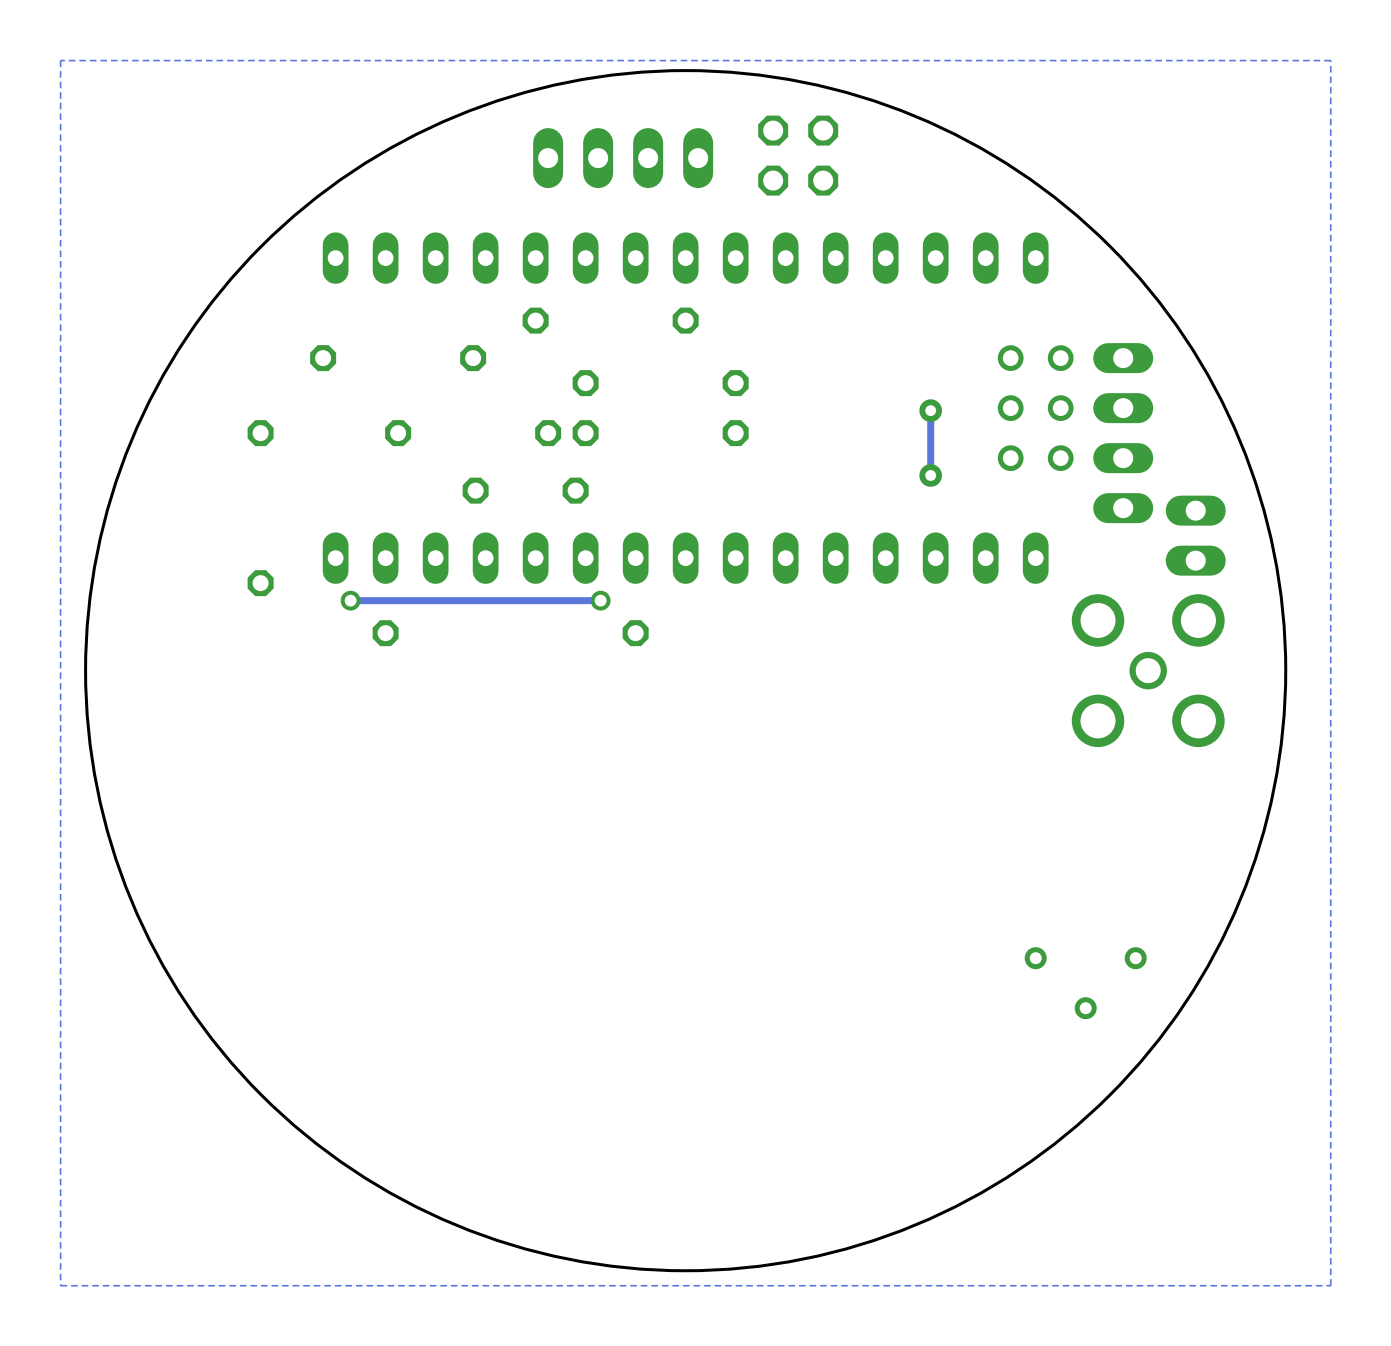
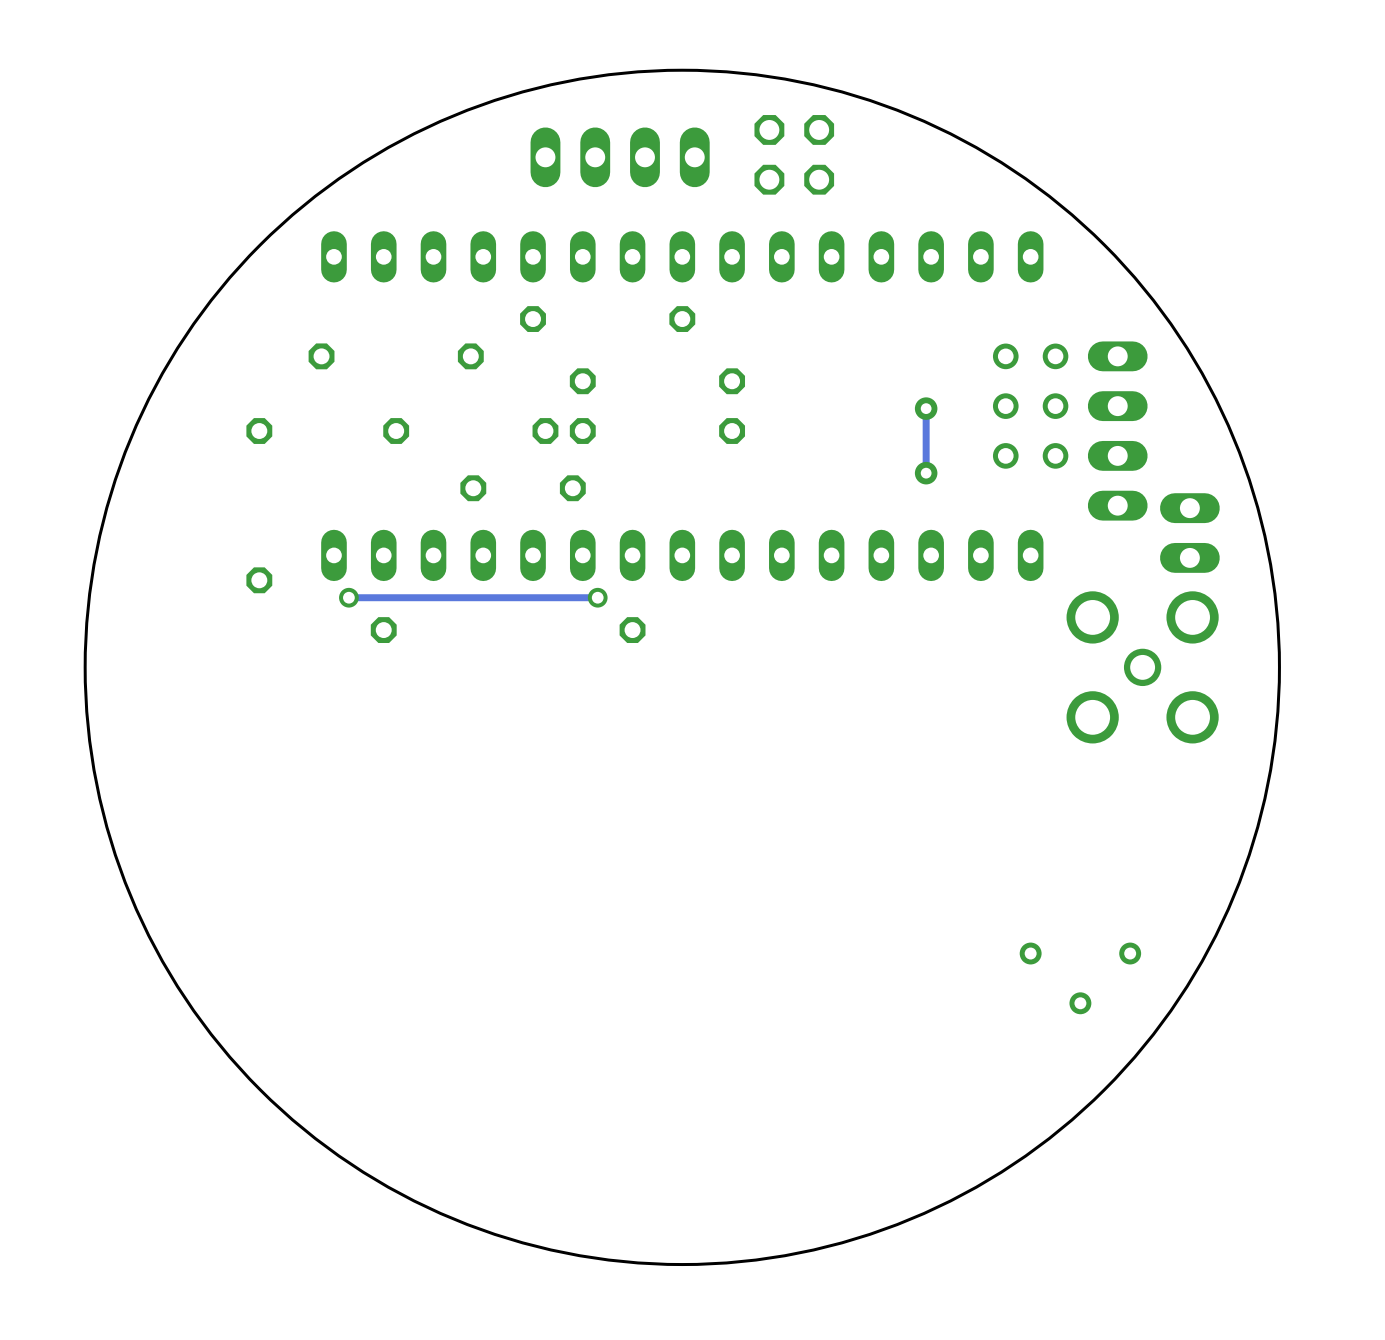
zone outline: (1330, 60) (60, 60) (60, 1285) (1330, 1285) (1330, 60) -> none

